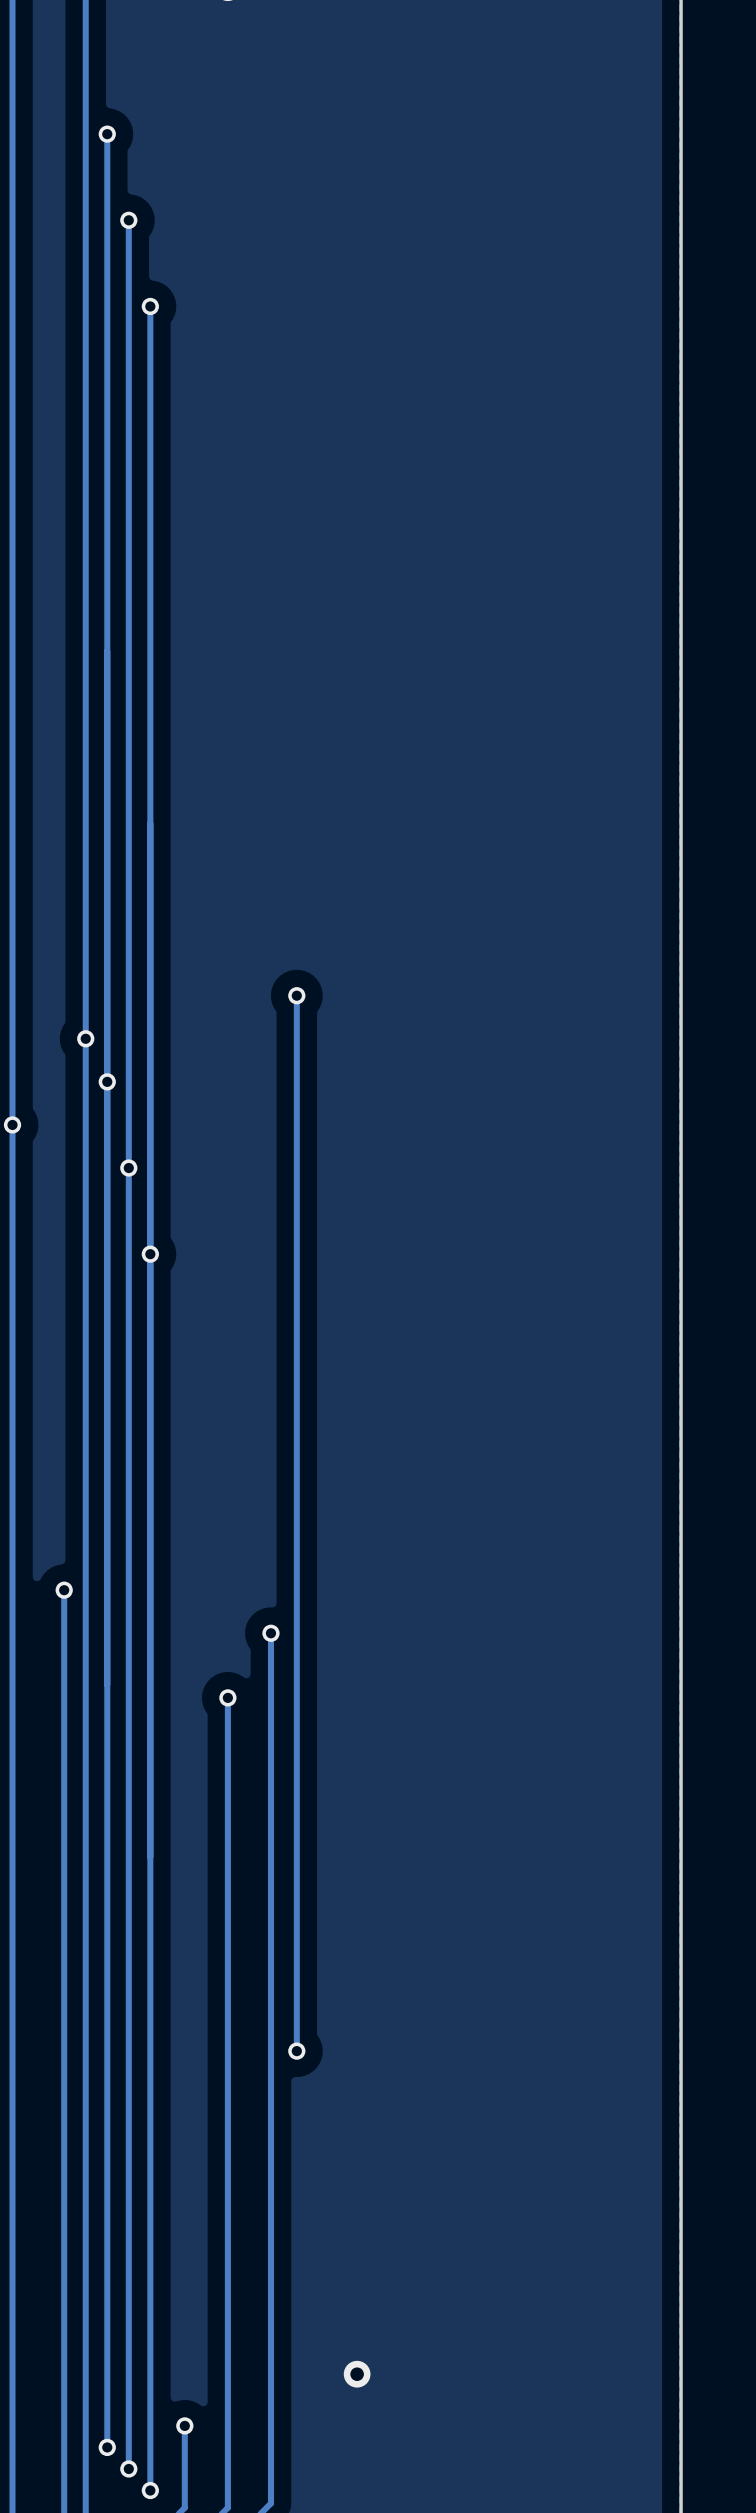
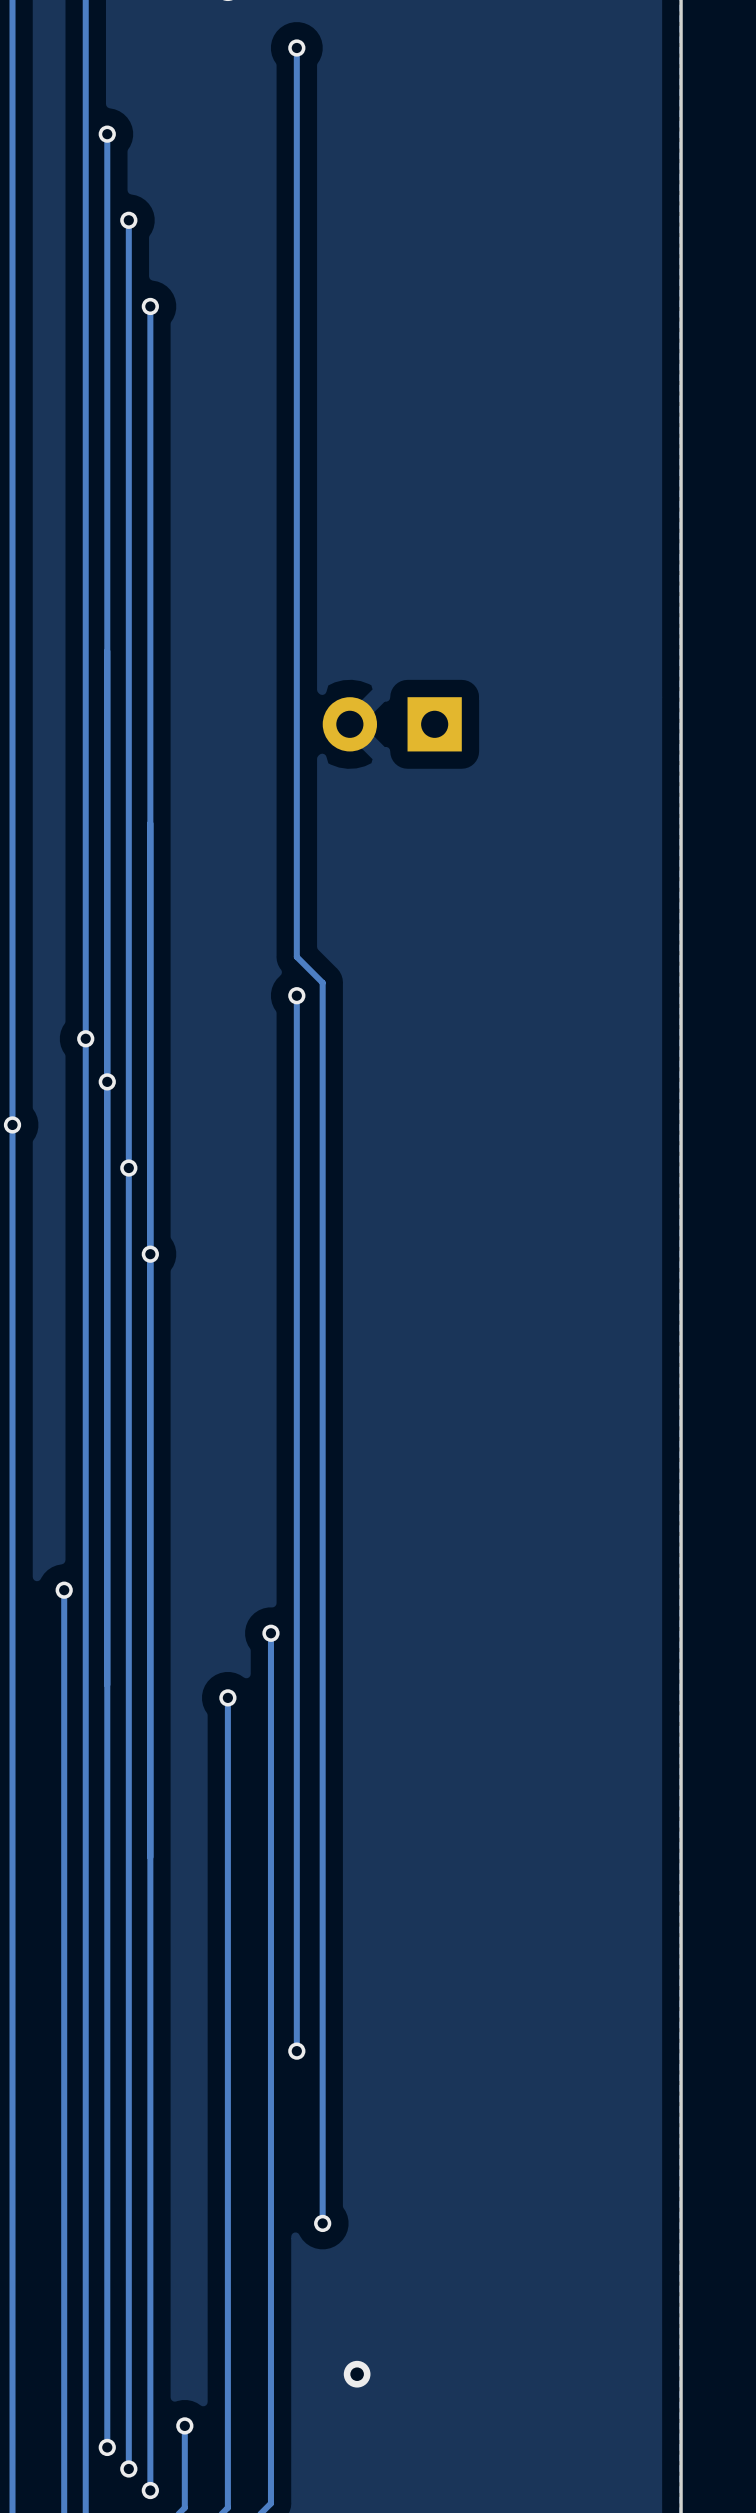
track: none -> (296, 47) (296, 956) (322, 982) (322, 2223)
via: none -> (296, 47)
part: none -> (392, 724)
via: none -> (322, 2223)

